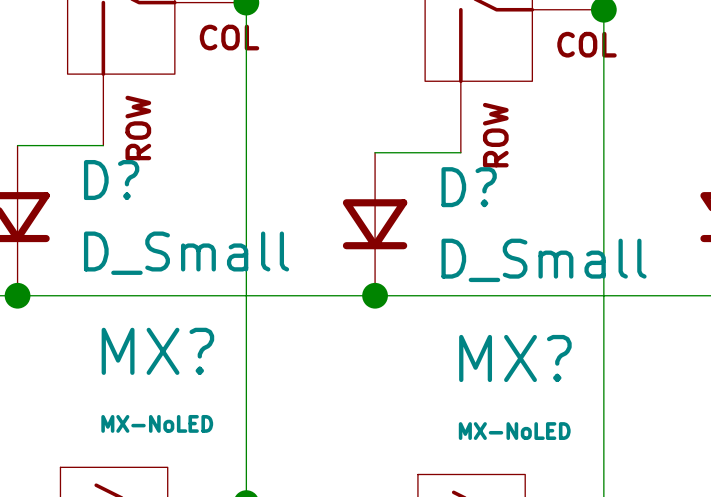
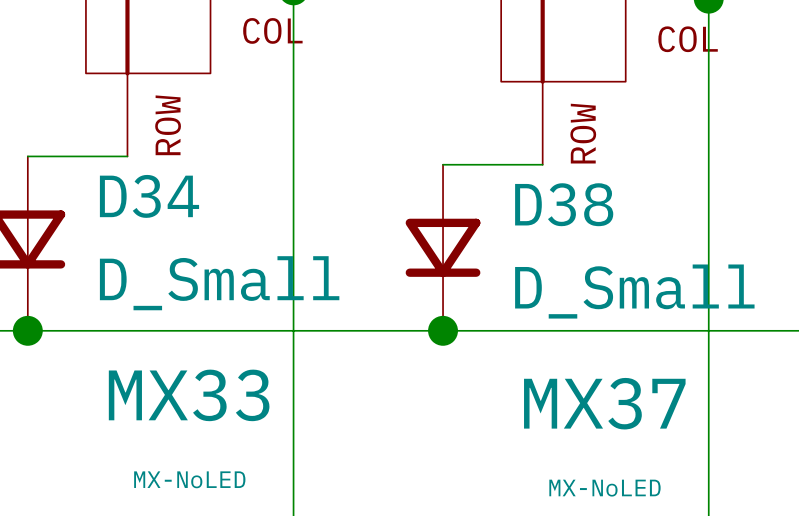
D? name: D? (111, 180) -> D34 (149, 196)
D? name: D? (469, 187) -> D38 (564, 204)
MX? name: MX? (157, 351) -> MX33 (189, 395)
MX? name: MX? (515, 358) -> MX37 (604, 403)

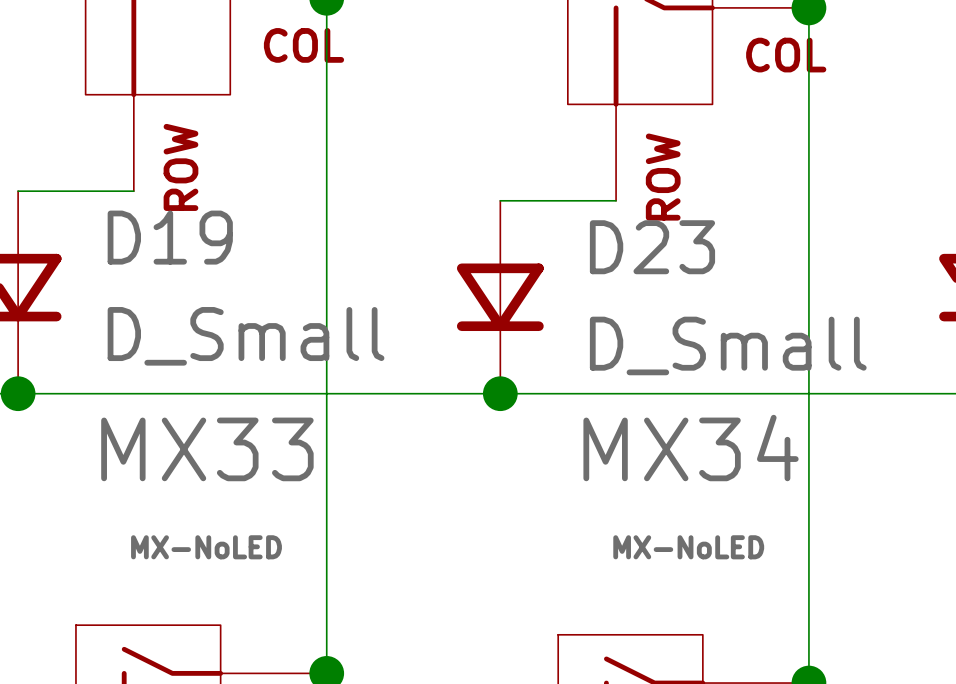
D34 name: D34 (149, 196) -> D19 (170, 237)
D38 name: D38 (564, 204) -> D23 (652, 247)
MX33 name position: MX33 (189, 395) -> MX33 (207, 449)
MX37 name: MX37 (604, 403) -> MX34 (691, 448)
MX33 value position: MX-NoLED (189, 479) -> MX-NoLED (206, 547)
MX37 value position: MX-NoLED (604, 488) -> MX-NoLED (688, 547)

